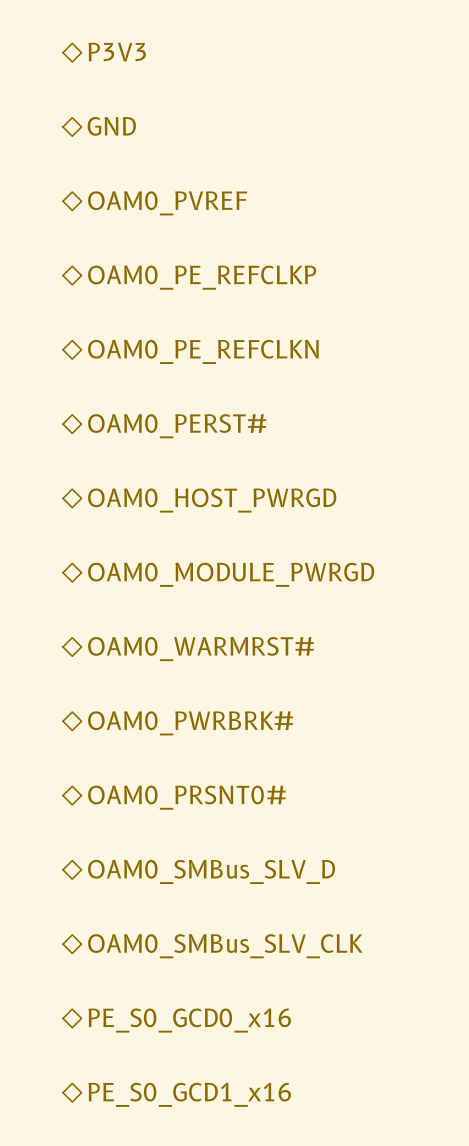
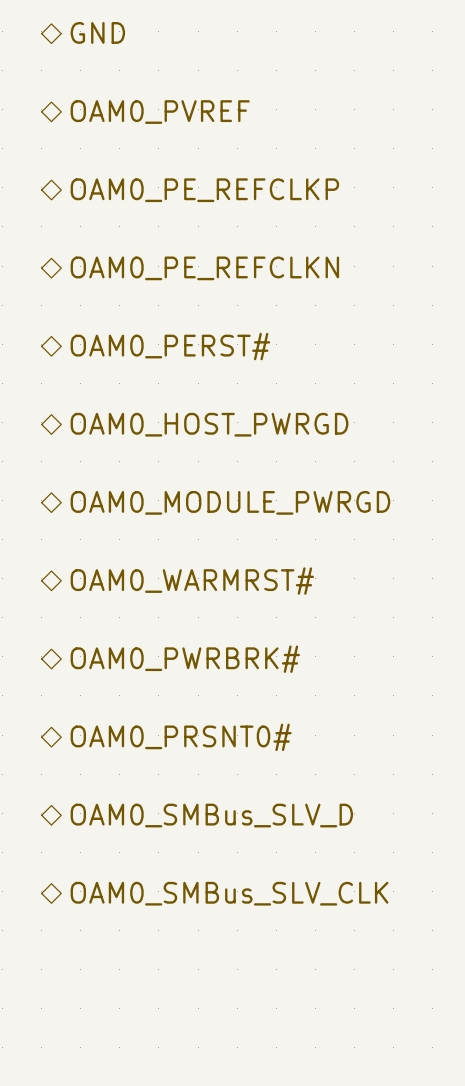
hierarchical label: PE_S0_GCD0_x16 (189, 1020) -> none
hierarchical label: PE_S0_GCD1_x16 (189, 1094) -> none

